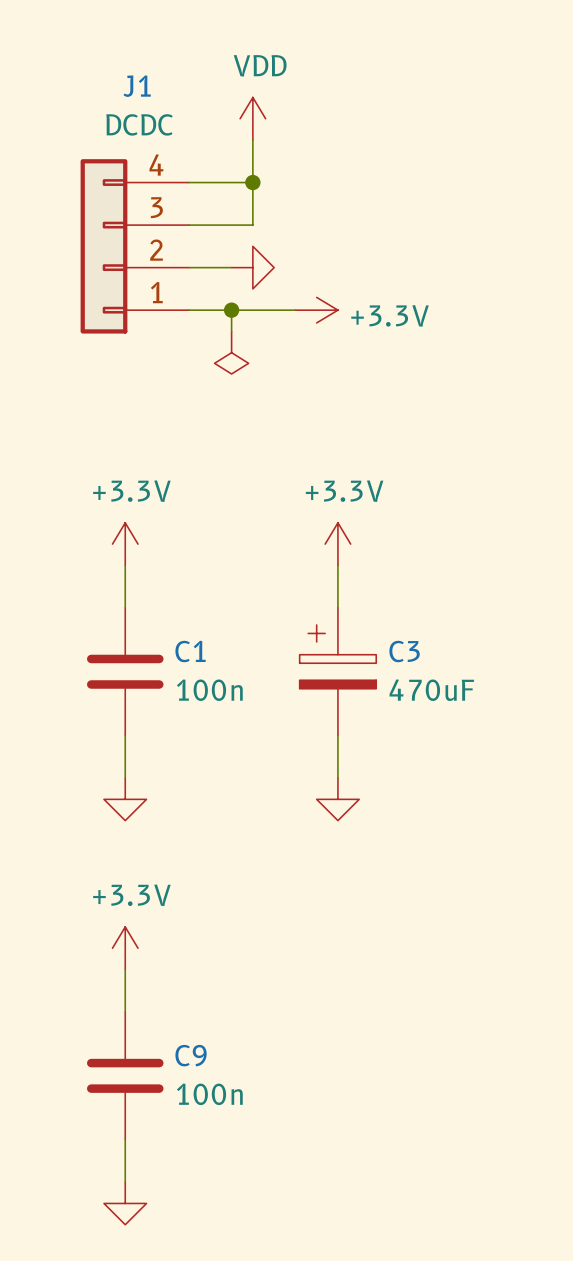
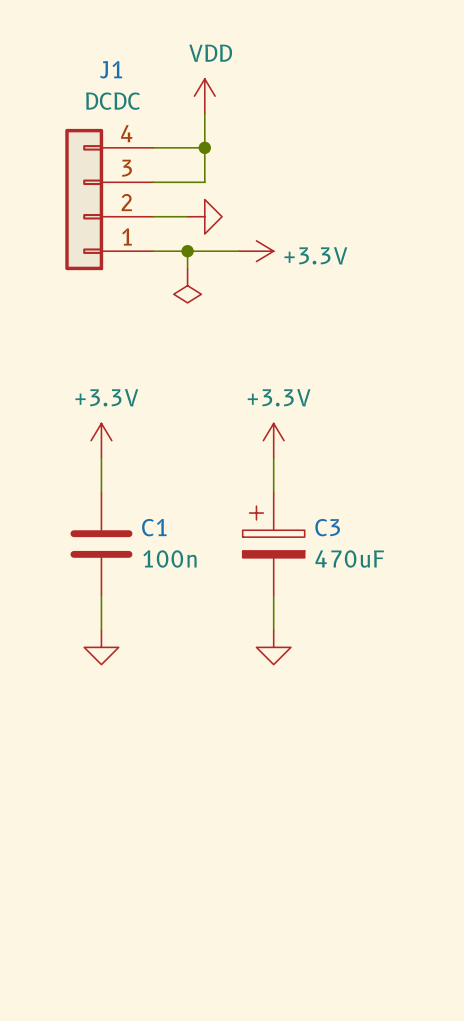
power symbol: +3.3V (125, 948) -> none
wire: (125, 969) (125, 1012) -> none
C9: 100n (125, 1075) -> none
wire: (125, 1139) (125, 1182) -> none
power symbol: (125, 1203) -> none

